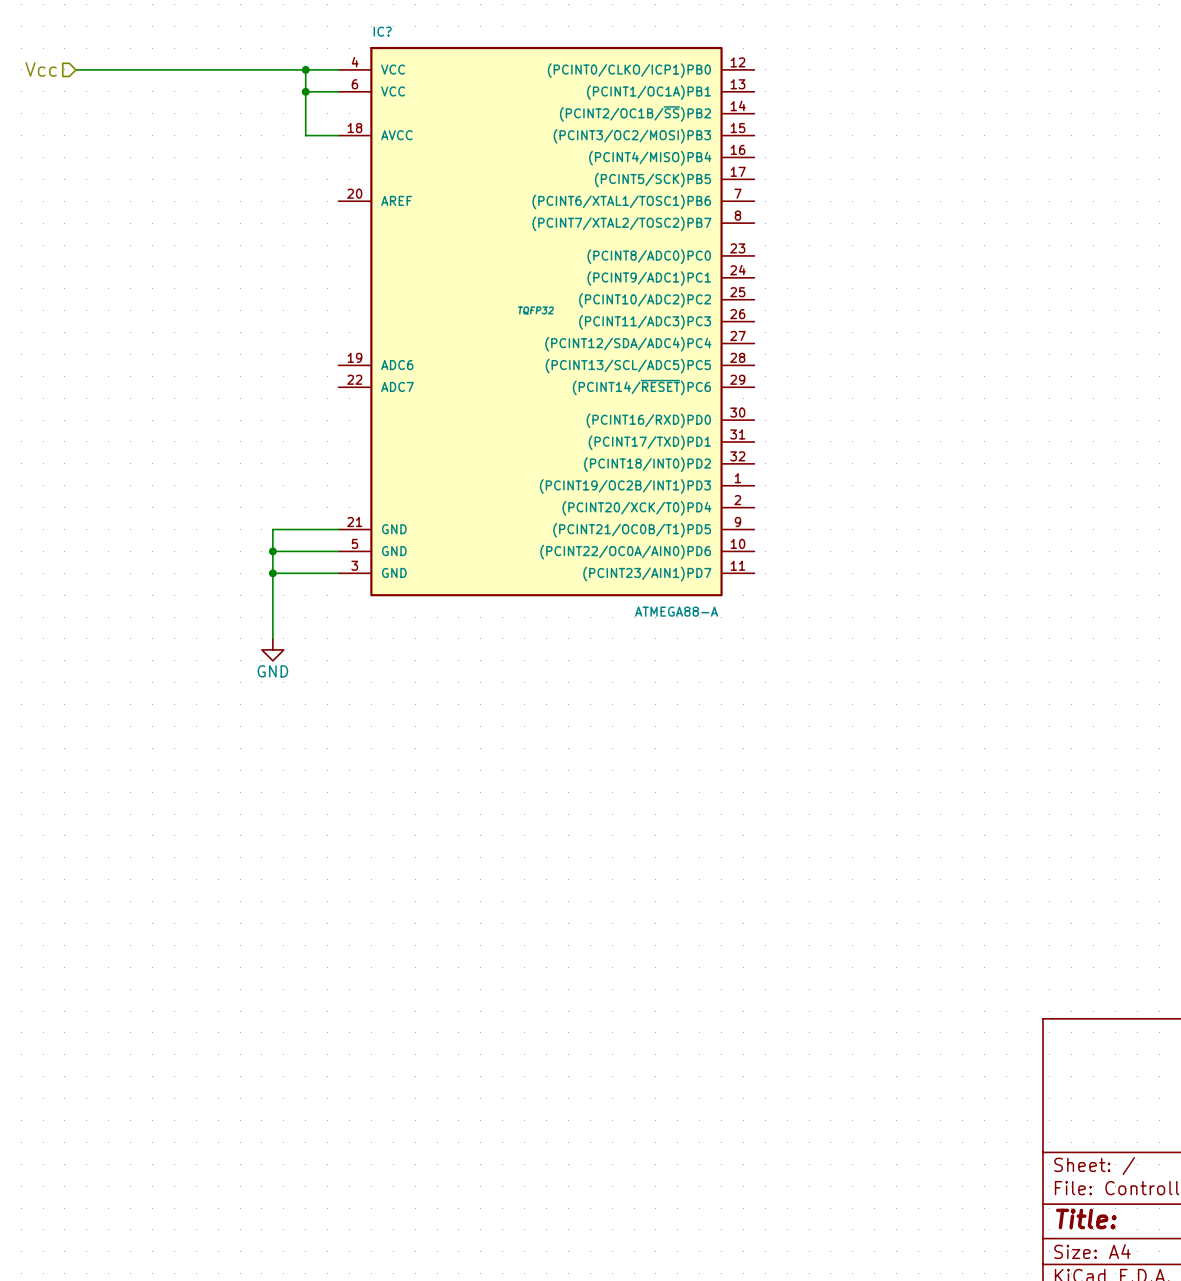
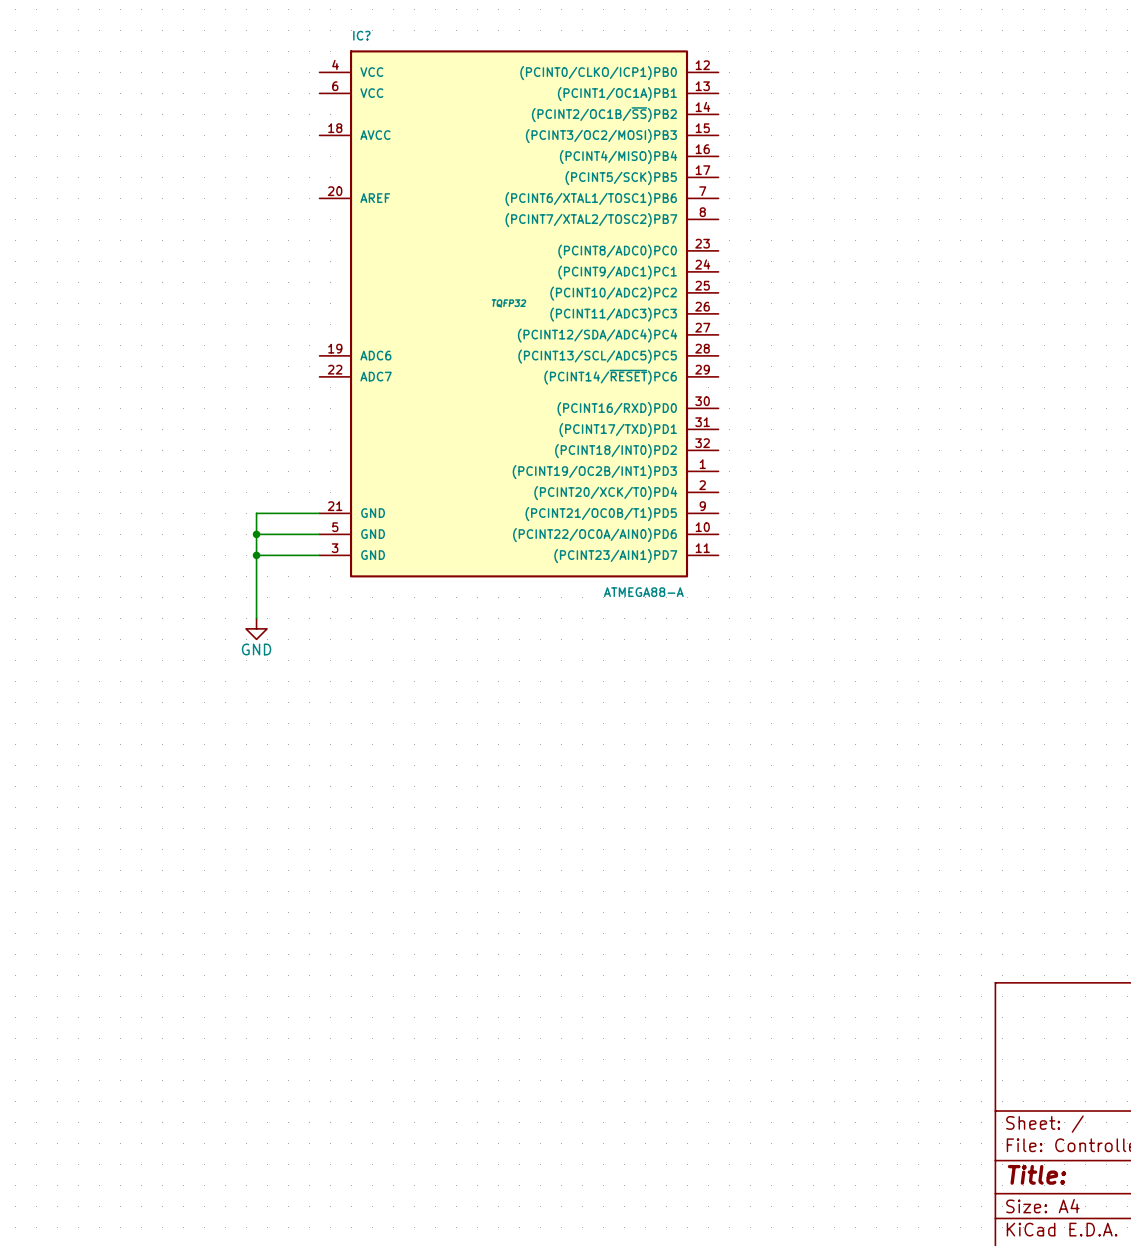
hierarchical label: Vcc (41, 69) -> none
wire: (75, 69) (338, 69) -> none
wire: (305, 69) (305, 135) (338, 135) -> none
junction: (305, 69) -> none
wire: (305, 91) (338, 91) -> none
junction: (305, 91) -> none

